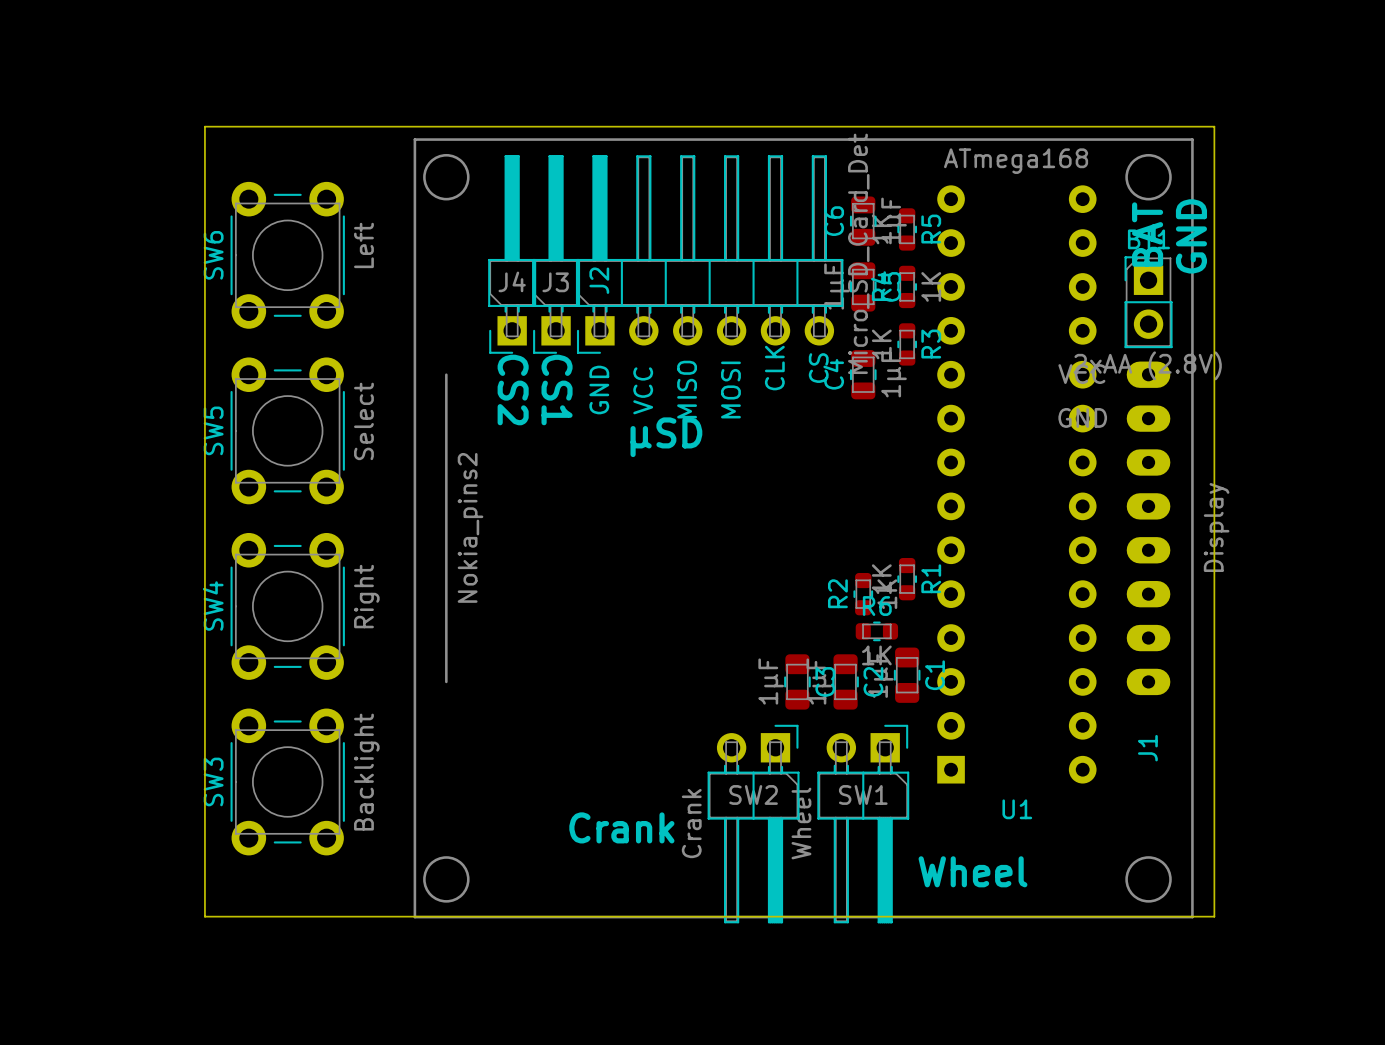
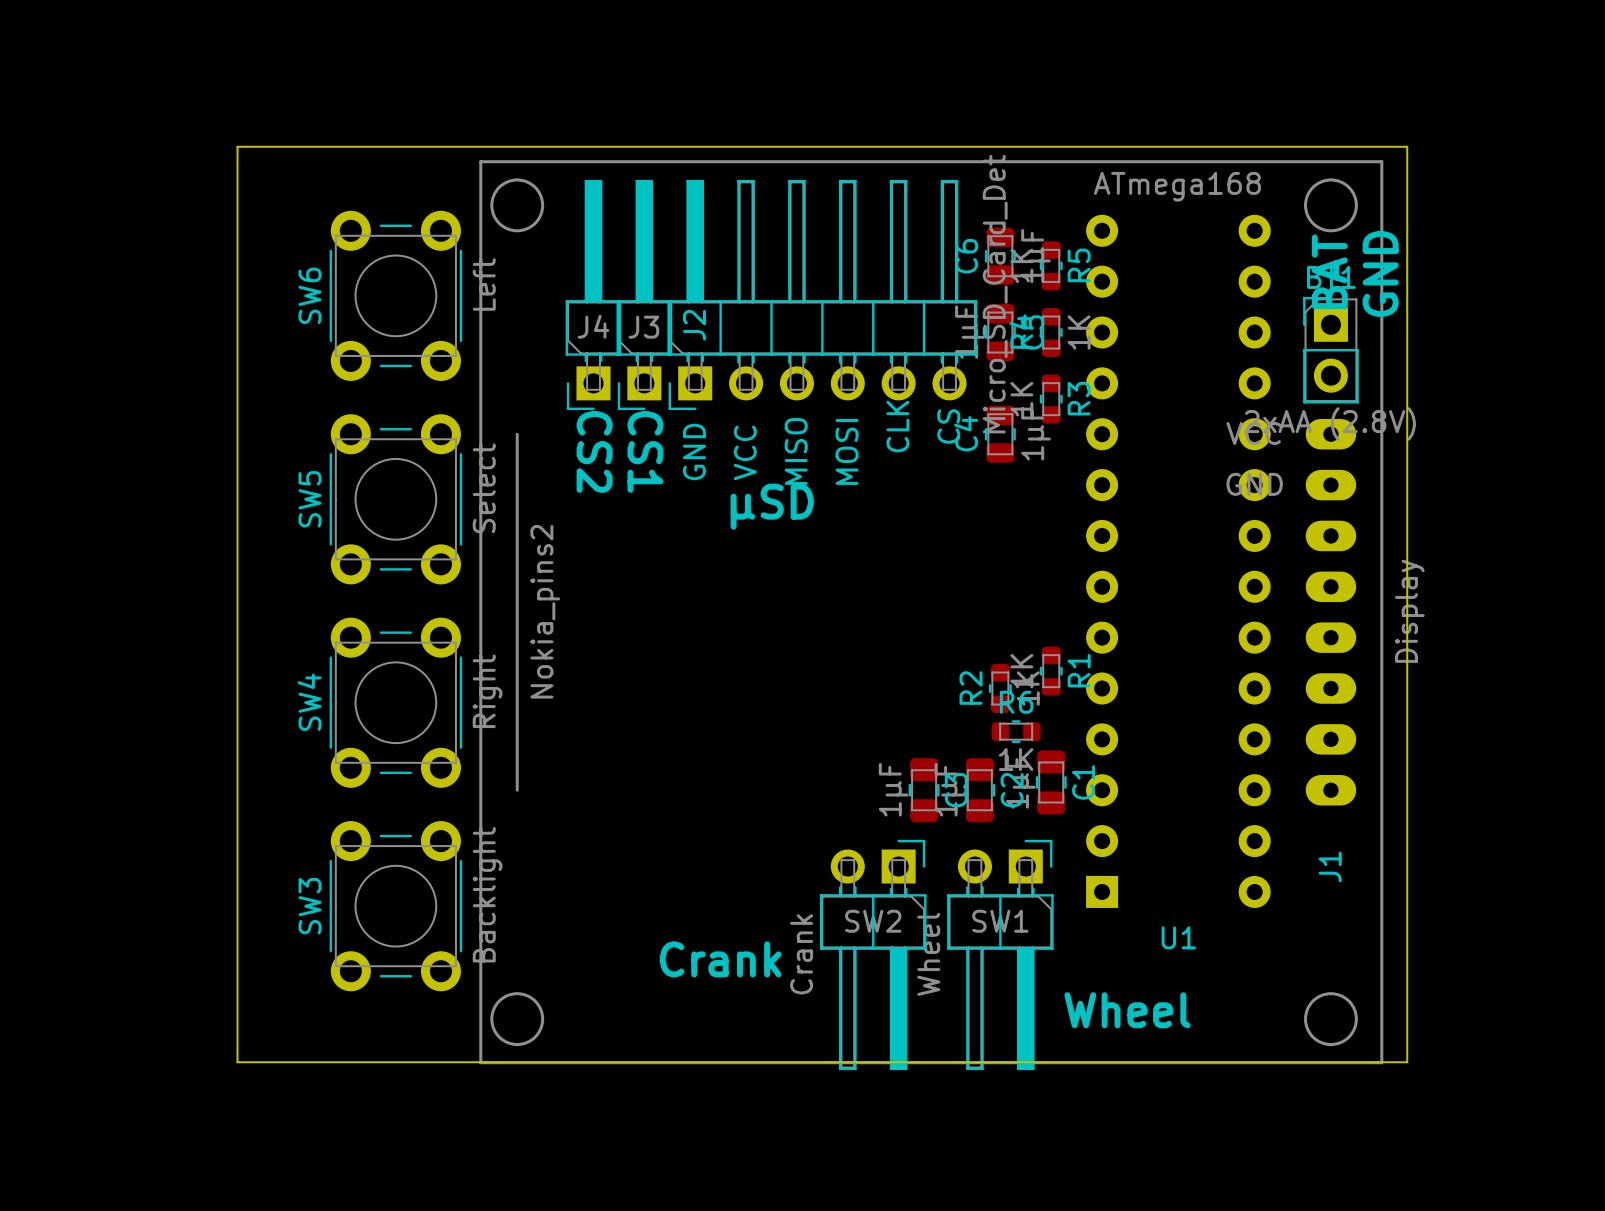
SW6 position: (287, 255) -> (395, 295)
SW5 position: (287, 430) -> (395, 499)
SW4 position: (287, 606) -> (395, 702)
SW3 position: (287, 781) -> (395, 906)

